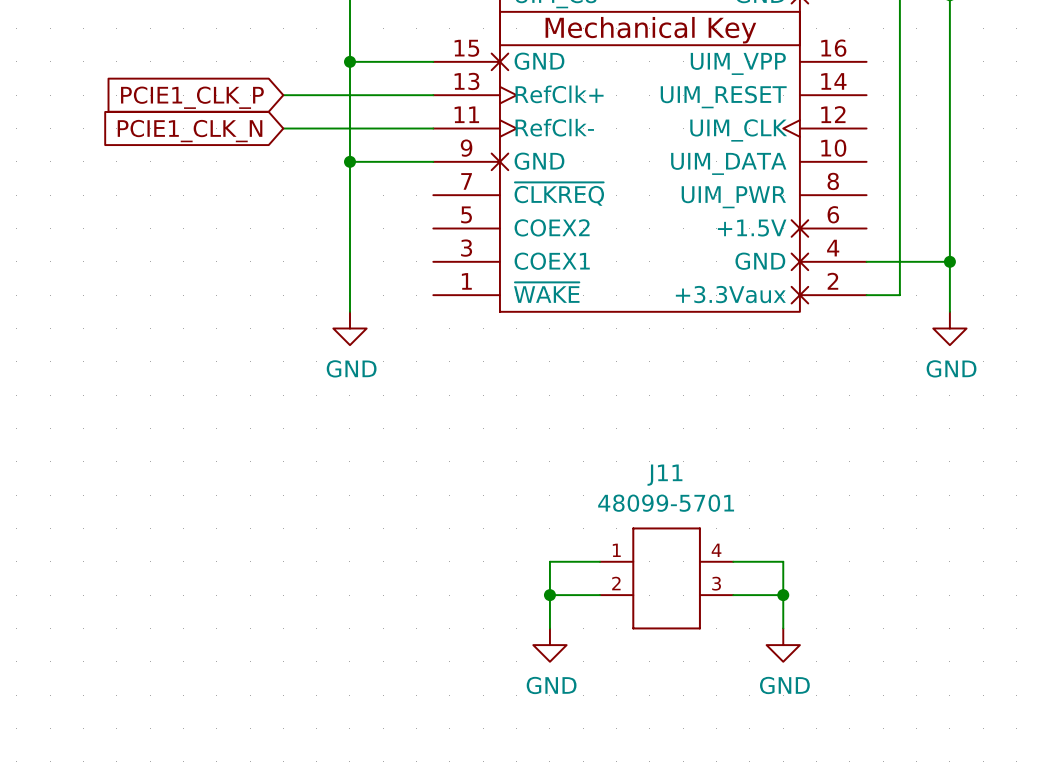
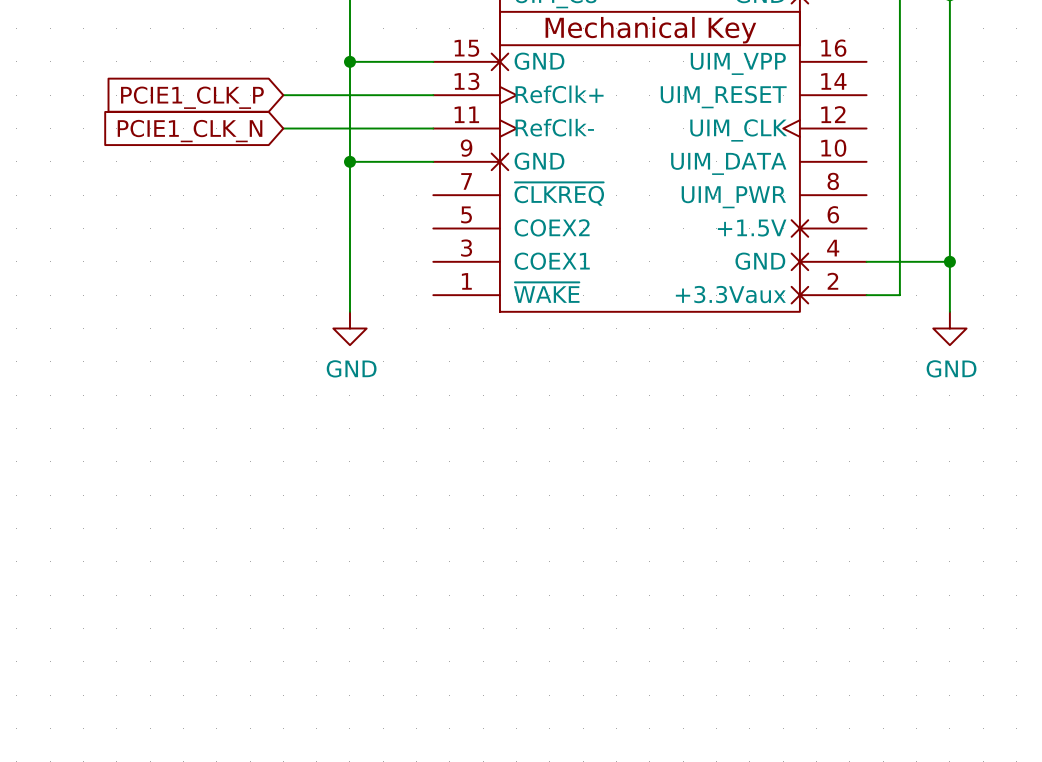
wire: (599, 561) (549, 561) (549, 628) -> none
wire: (733, 561) (783, 561) (783, 628) -> none
J11: 48099-5701 (666, 578) -> none
wire: (549, 595) (599, 595) -> none
junction: (549, 595) -> none
wire: (733, 595) (783, 595) -> none
junction: (783, 595) -> none
power symbol: GND (549, 645) -> none
power symbol: GND (783, 645) -> none

